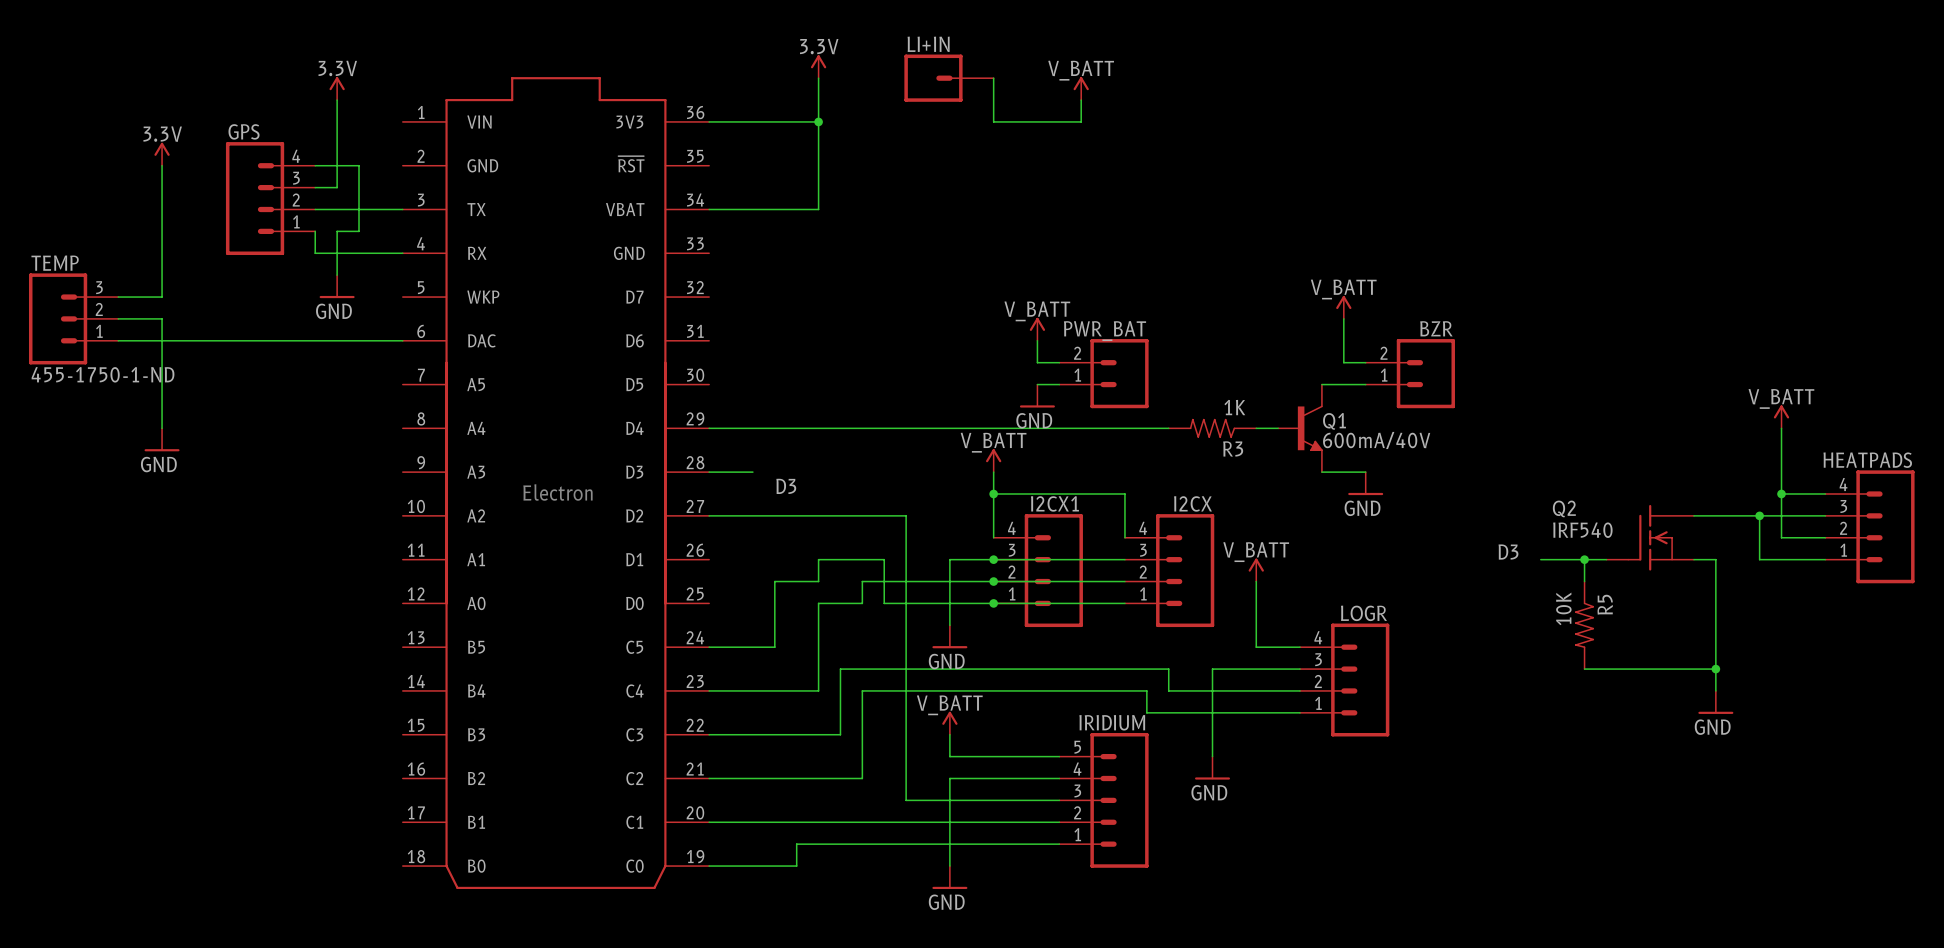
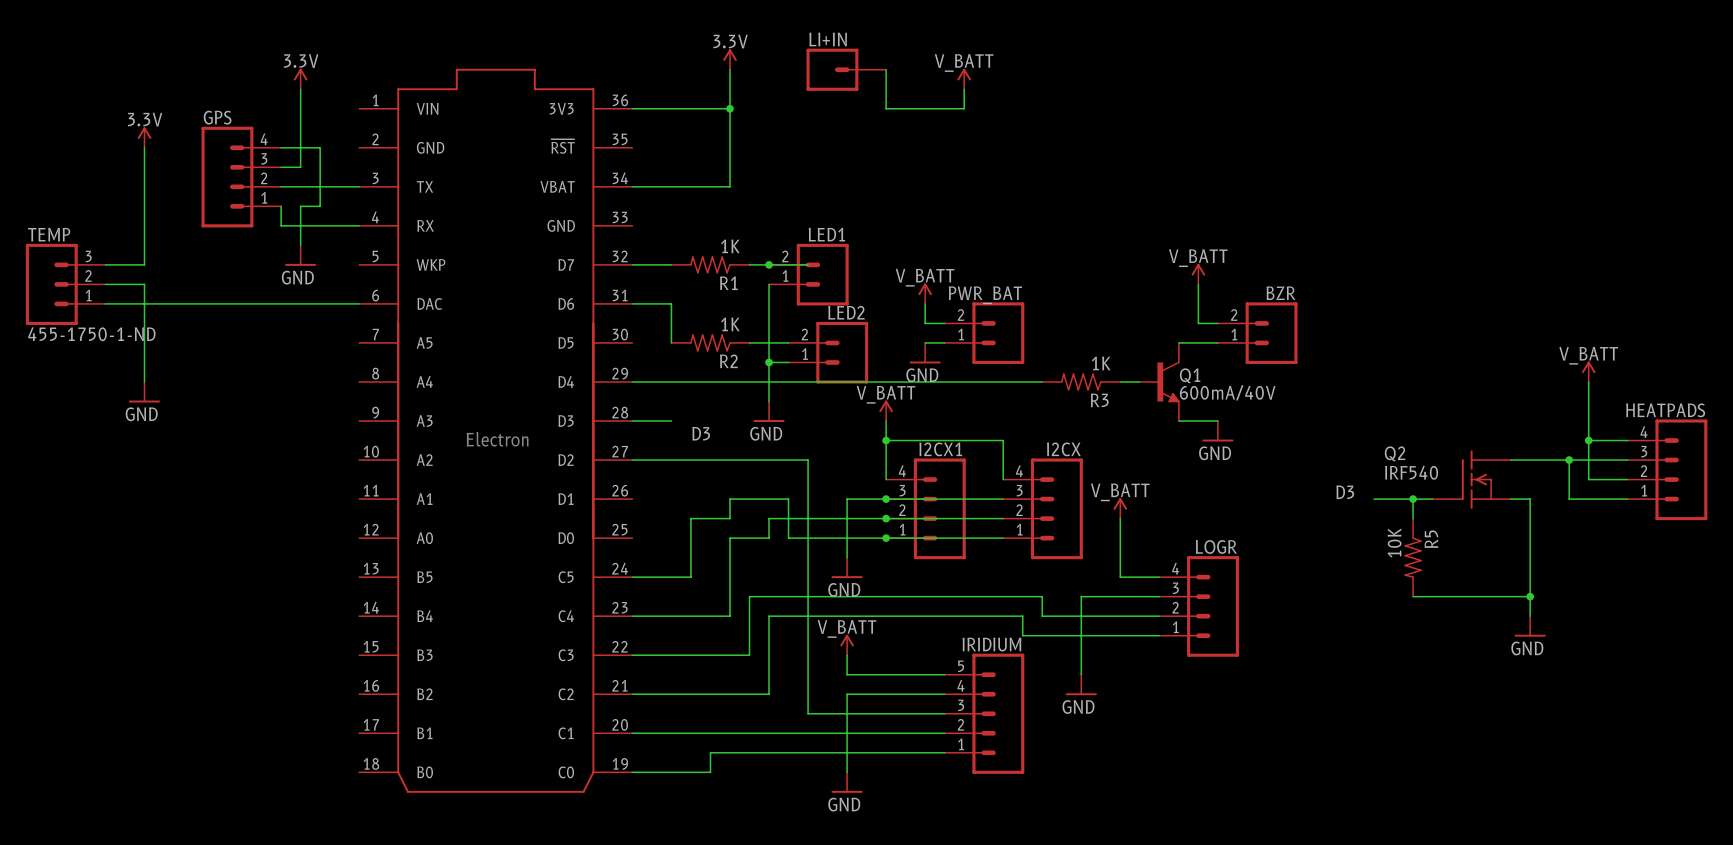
wire: none -> (632, 264) (671, 264)
R1: none -> 1K (710, 264)
wire: none -> (749, 264) (808, 264)
junction: none -> (769, 264)
LED1: none -> (808, 274)
wire: none -> (769, 284) (769, 401)
wire: none -> (632, 303) (671, 303) (671, 342)
R2: none -> 1K (710, 342)
wire: none -> (749, 342) (788, 342)
LED2: none -> (828, 352)
wire: none -> (769, 362) (788, 362)
junction: none -> (769, 362)
power symbol: none -> GND (769, 411)

